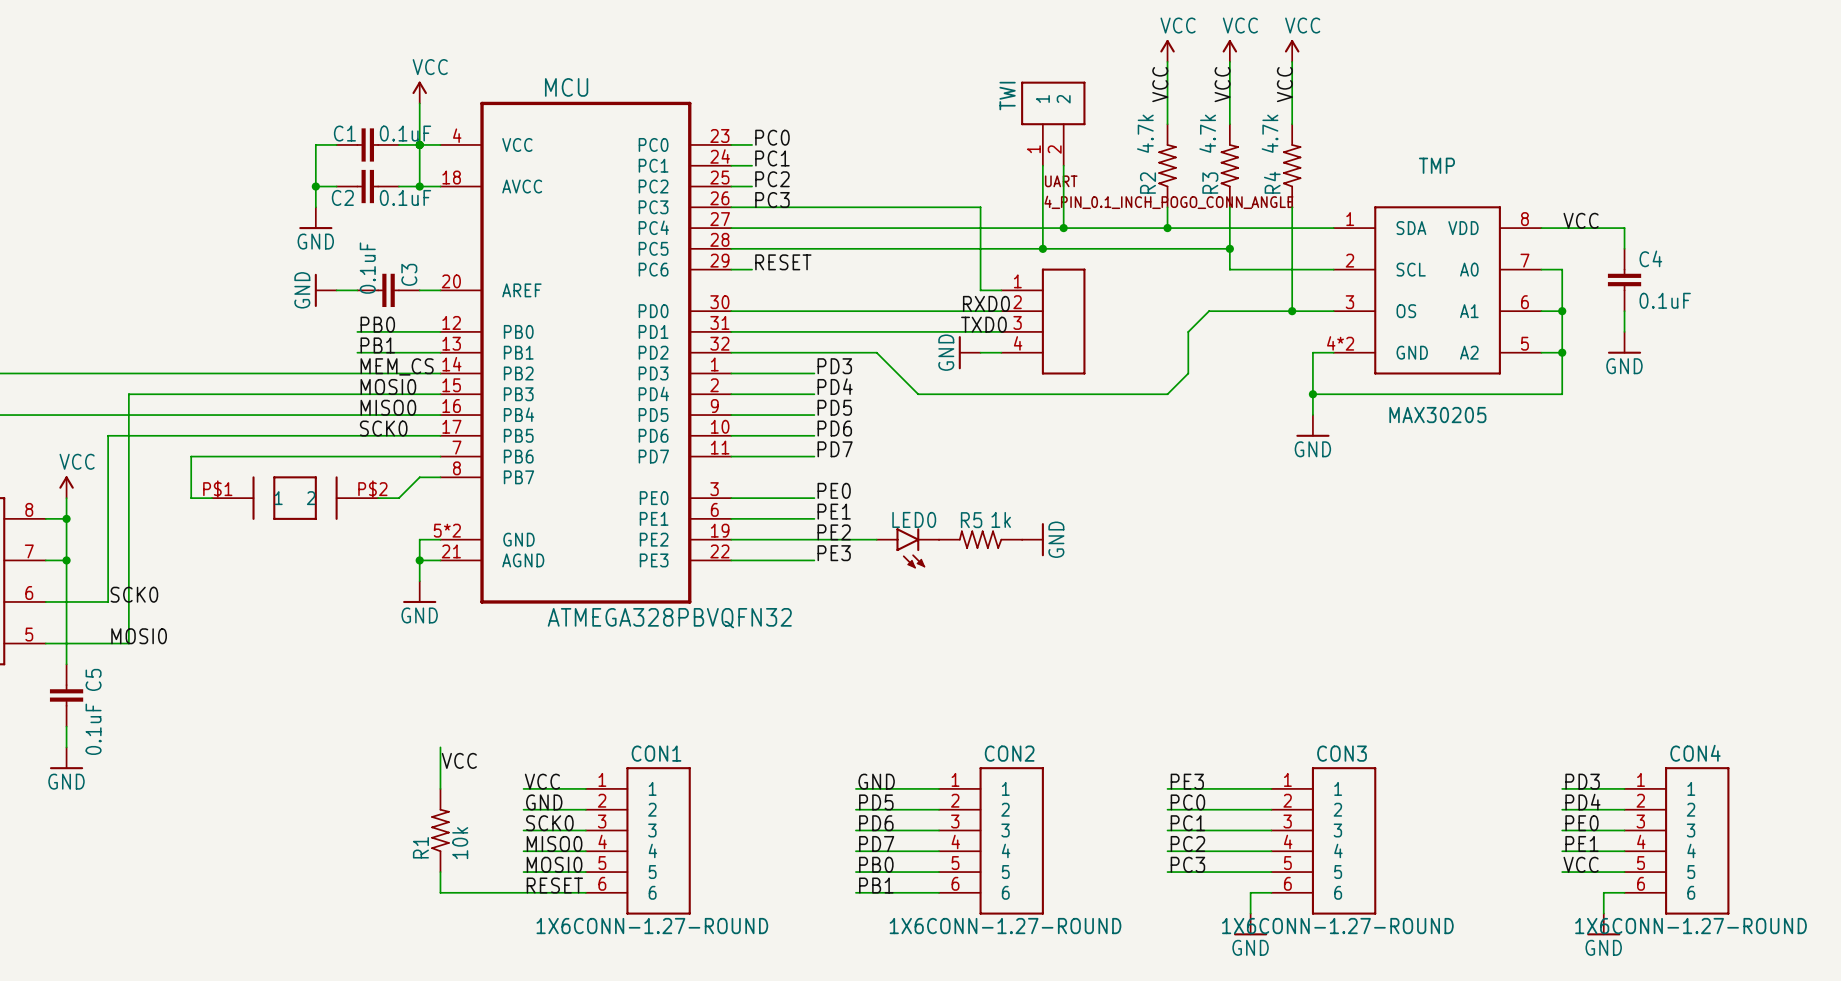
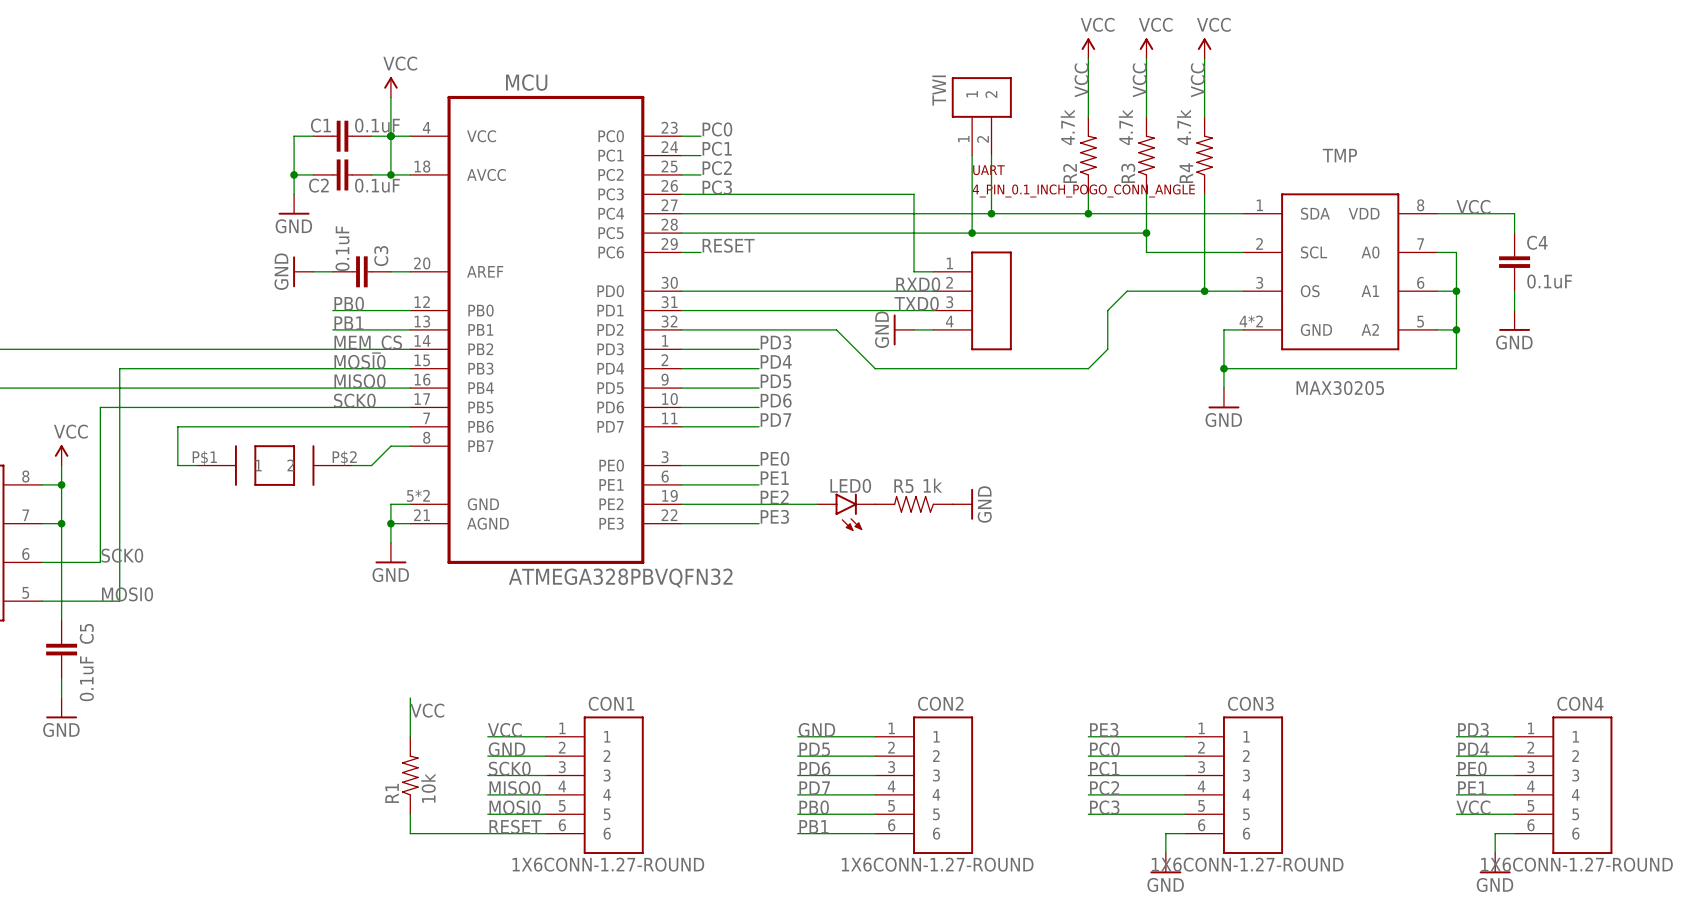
wire: (876, 352) (918, 394) (939, 394) -> (817, 329) (836, 329) (875, 368)

